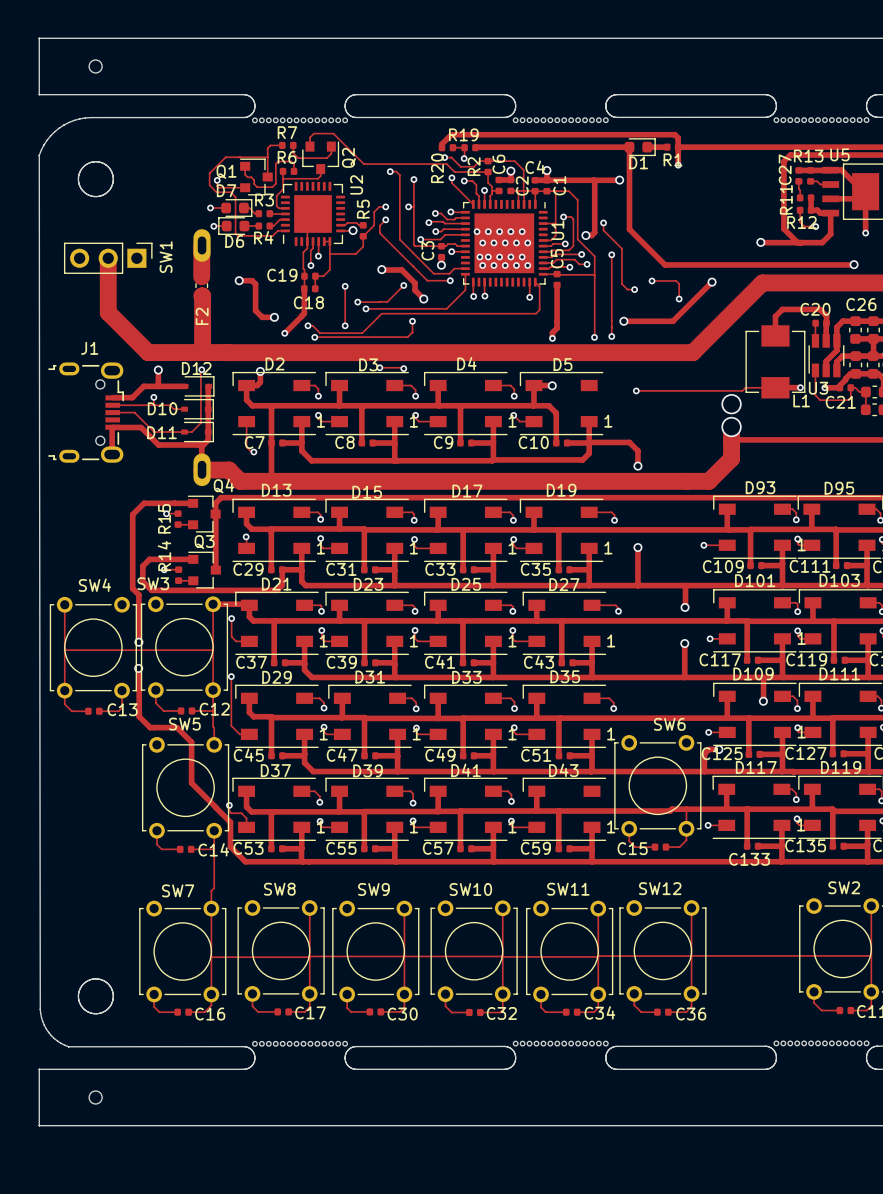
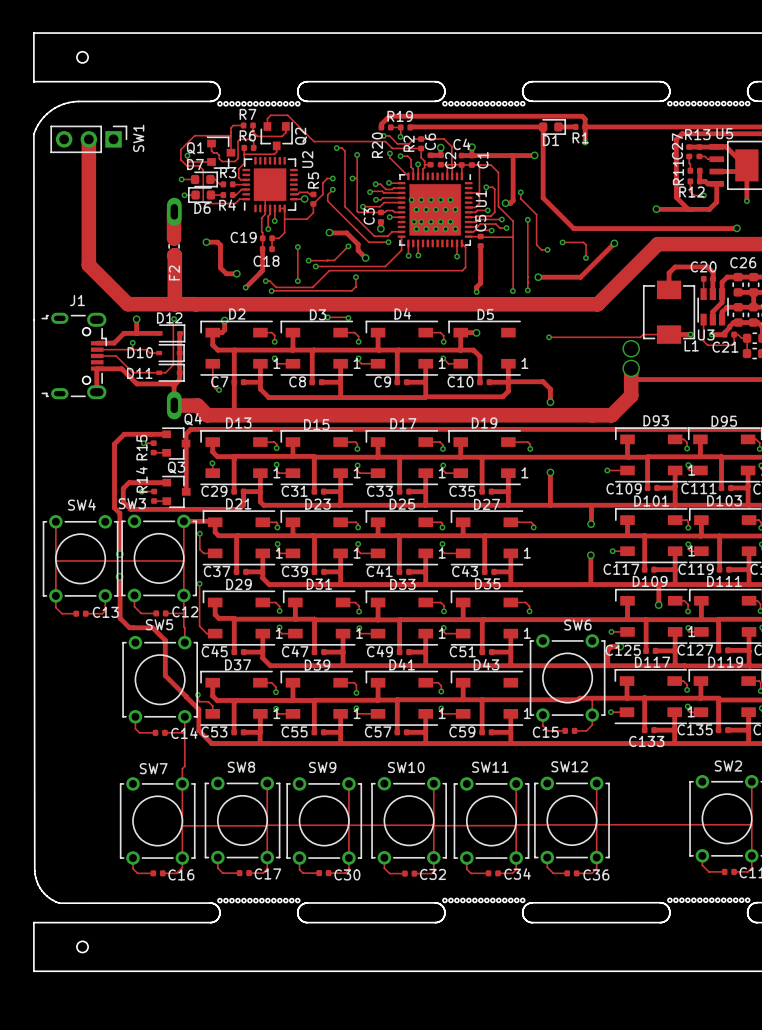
board edge: (95, 161) (107, 166) (113, 178) (108, 191) (95, 196) (83, 191) (78, 179) (83, 166) (95, 161) -> none
track: (108, 258) (108, 312) -> (88, 139) (88, 265) (93, 269)
SW1 position: (108, 258) -> (88, 139)
board edge: (95, 978) (107, 983) (113, 995) (108, 1008) (95, 1013) (83, 1009) (78, 996) (83, 984) (95, 978) -> none

